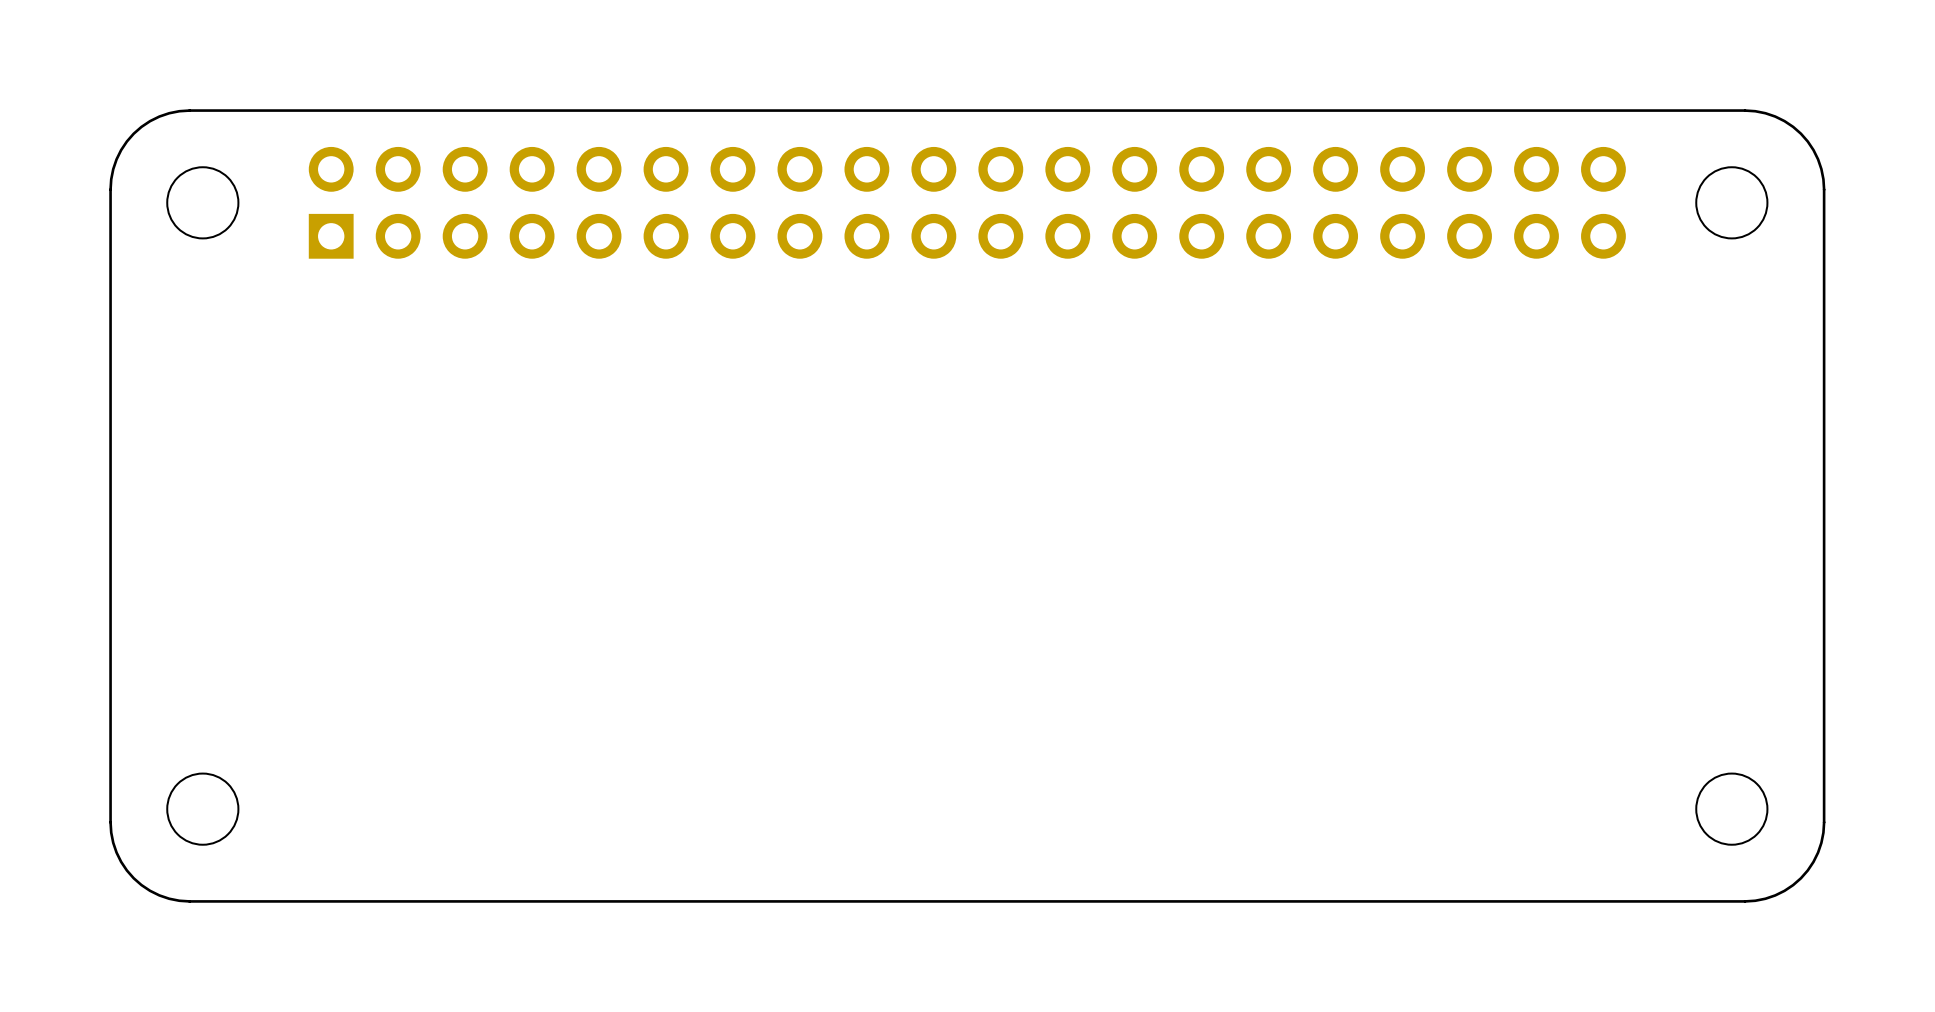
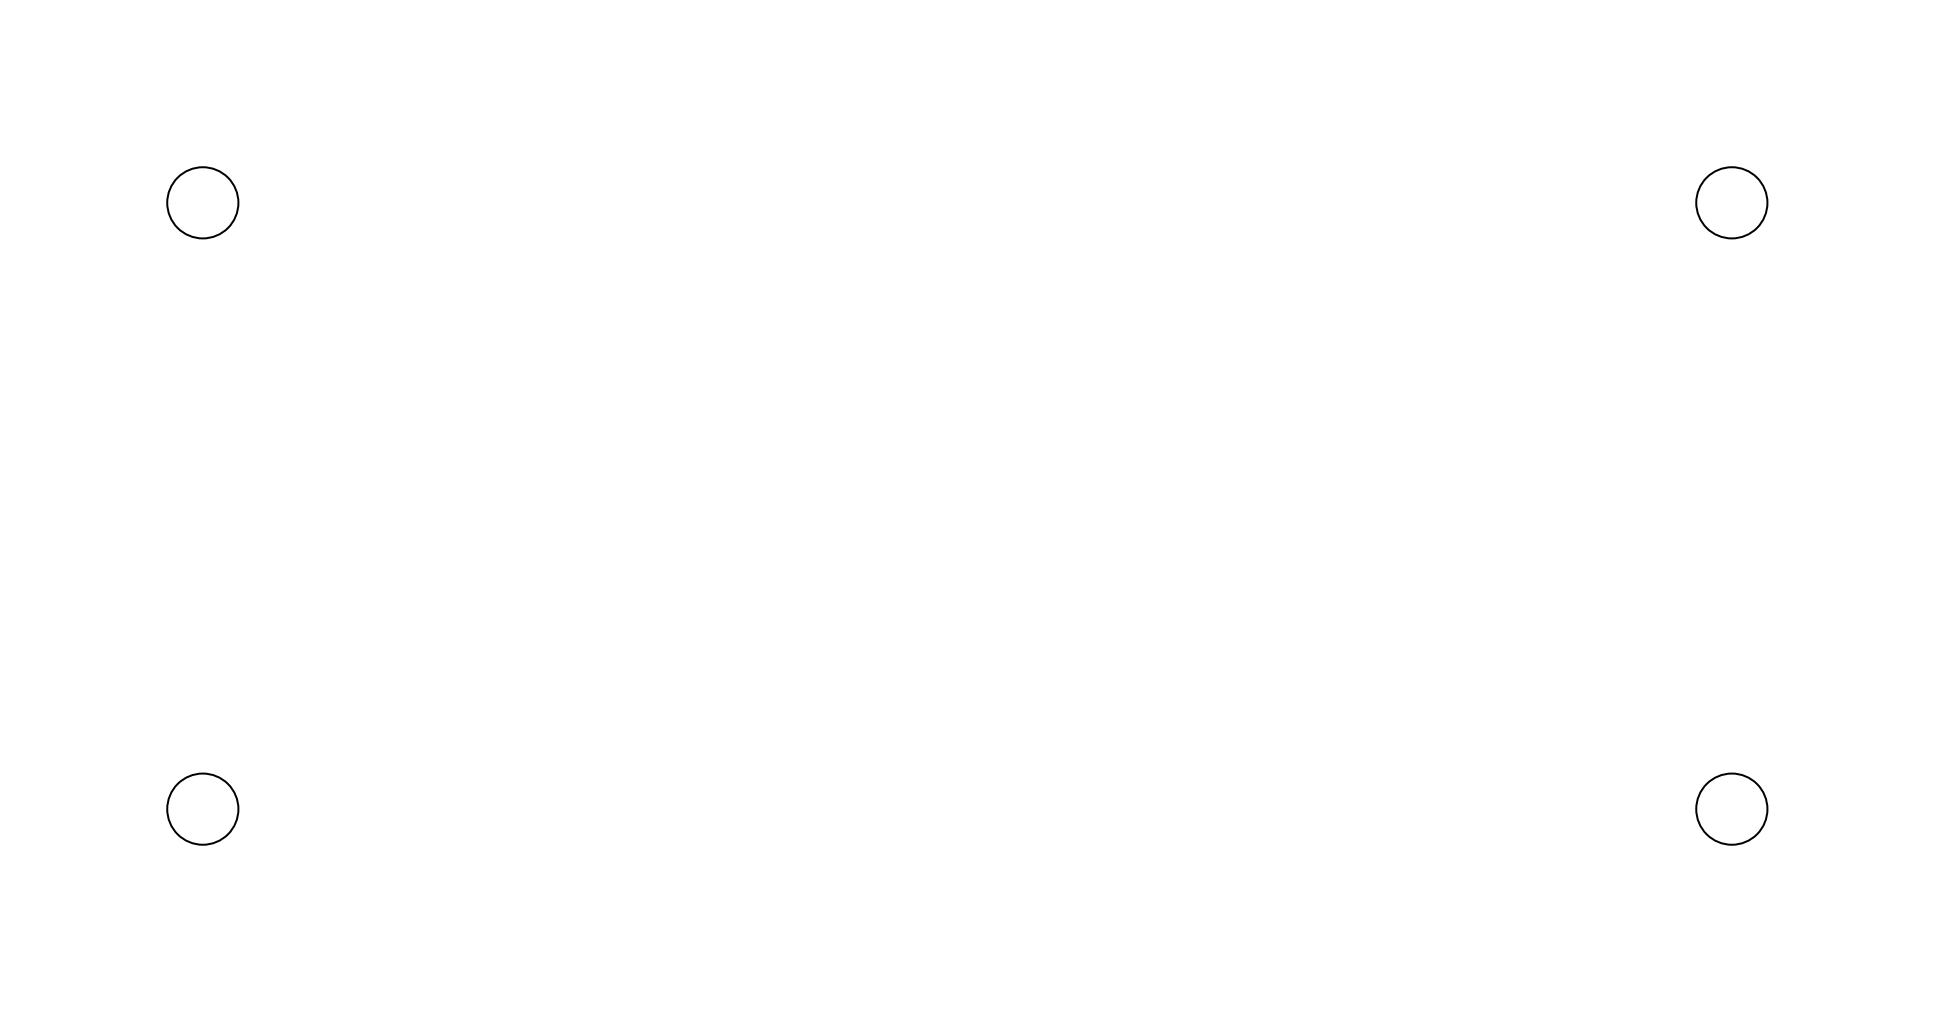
board edge: (189, 110) (1745, 110) (1775, 116) (1793, 126) (1807, 141) (1818, 159) (1824, 189) (1824, 822) (1818, 852) (1807, 870) (1793, 885) (1775, 895) (1745, 901) (189, 901) (159, 895) (141, 885) (126, 870) (116, 852) (111, 832) (110, 189) (116, 159) (133, 133) (159, 116) (189, 110) -> none
part: (967, 202) -> none

